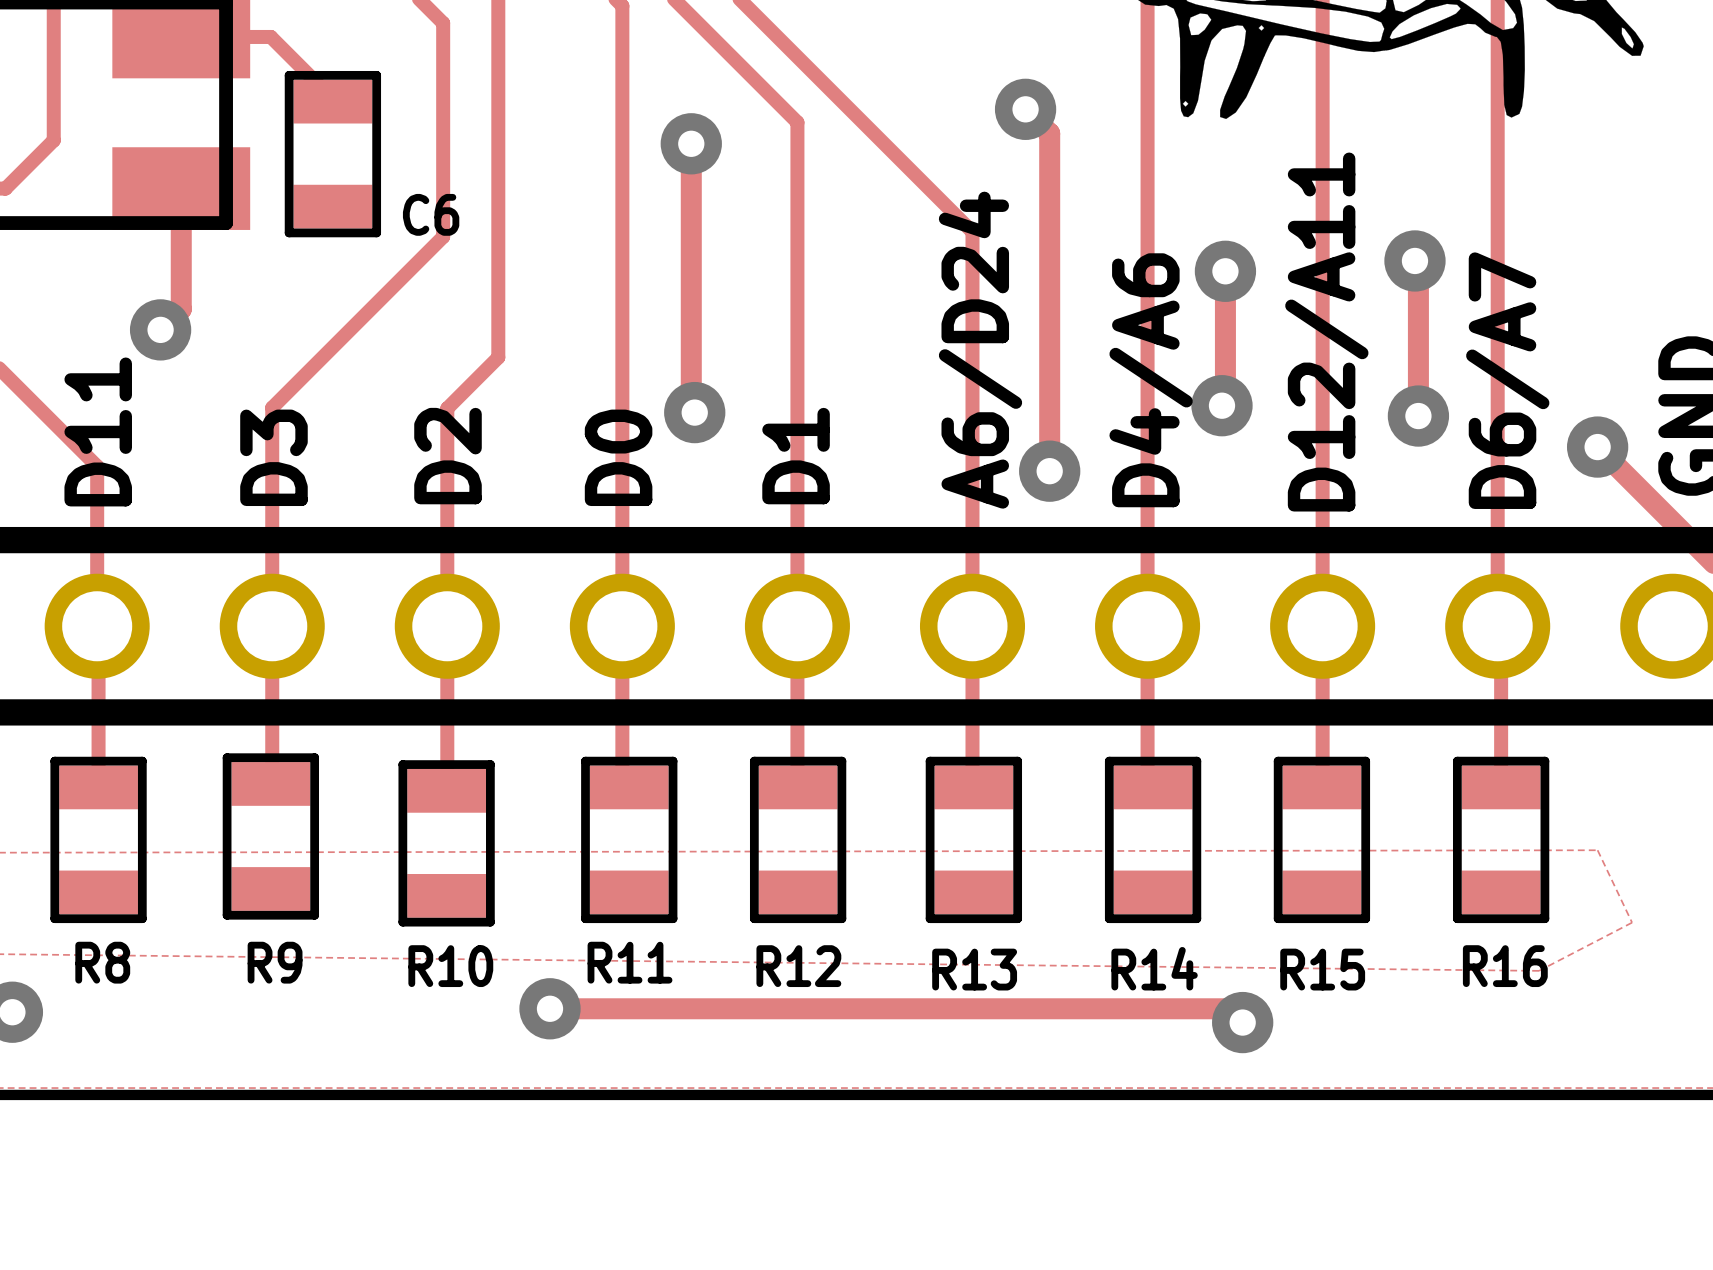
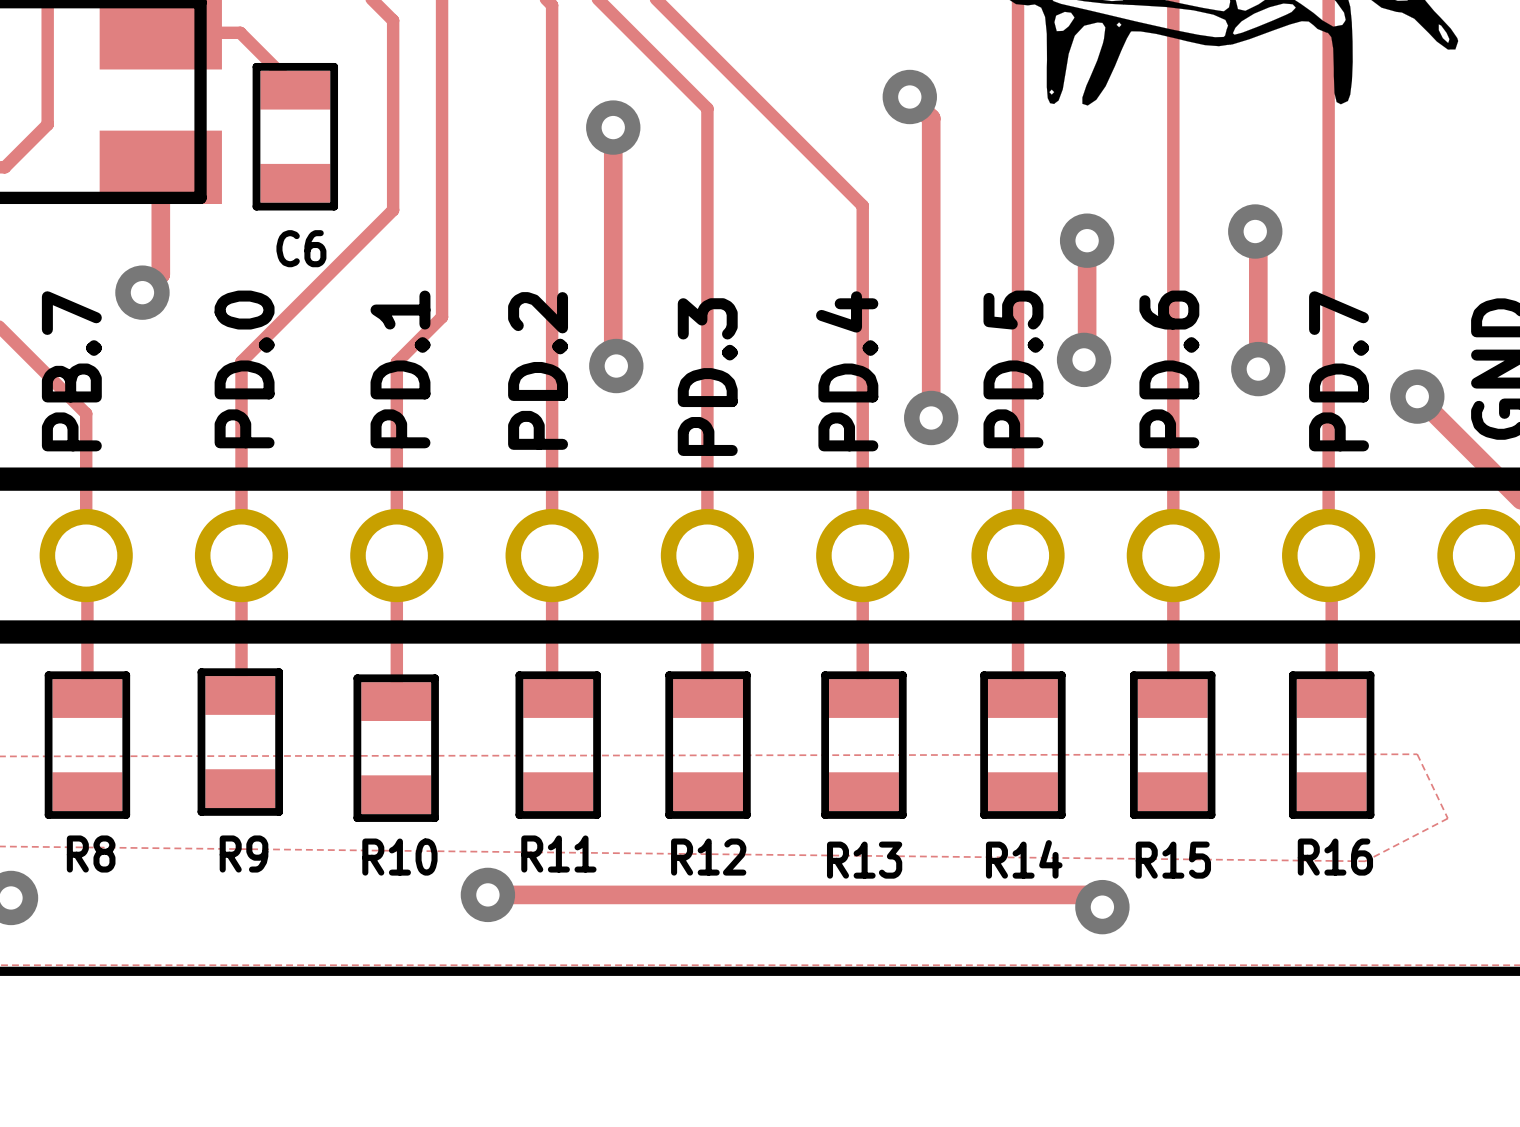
C6 name position: C6 (431, 214) -> C6 (301, 248)
text: D12/A11 (1326, 332) -> none
text: A6/D24 (980, 350) -> none
text: D4/A6 (1151, 380) -> PD.5 (1013, 369)
text: D6/A7 (1507, 380) -> PD.7 (1339, 371)
text: none -> PD.6 (1169, 369)
text: none -> PD.4 (847, 371)
text: D11 (98, 431) -> PB.7 (71, 371)
text: D2 (448, 456) -> PD.1 (400, 369)
text: D1 (796, 456) -> PD.3 (707, 377)
text: D3 (273, 457) -> PD.0 (244, 369)
text: D0 (618, 457) -> PD.2 (538, 370)

